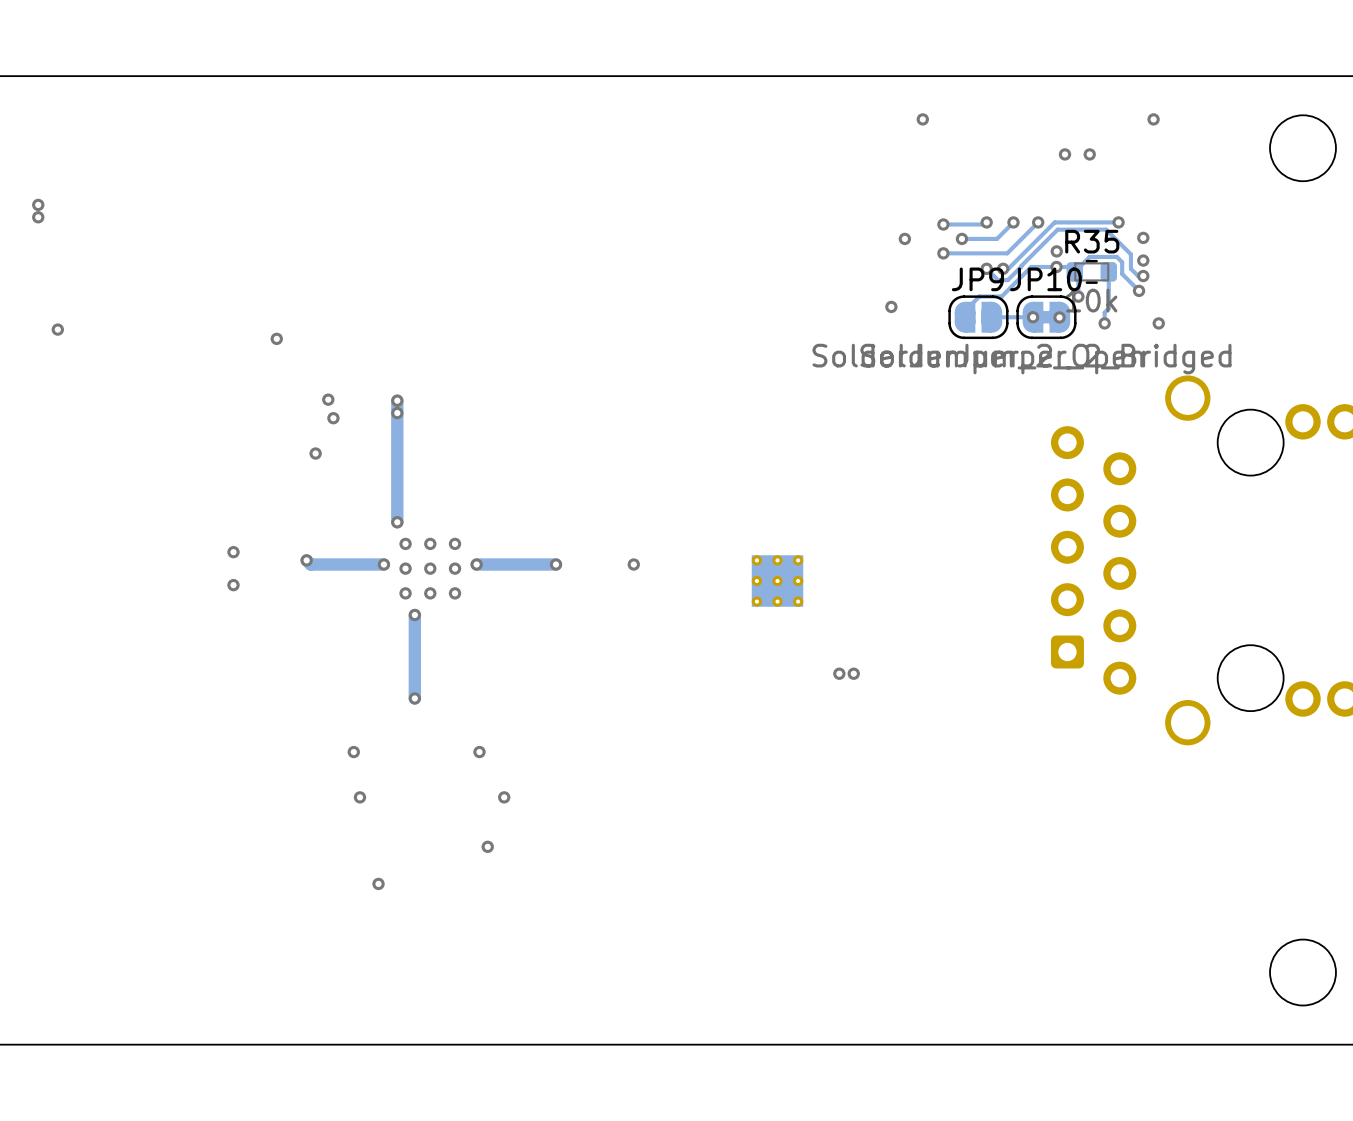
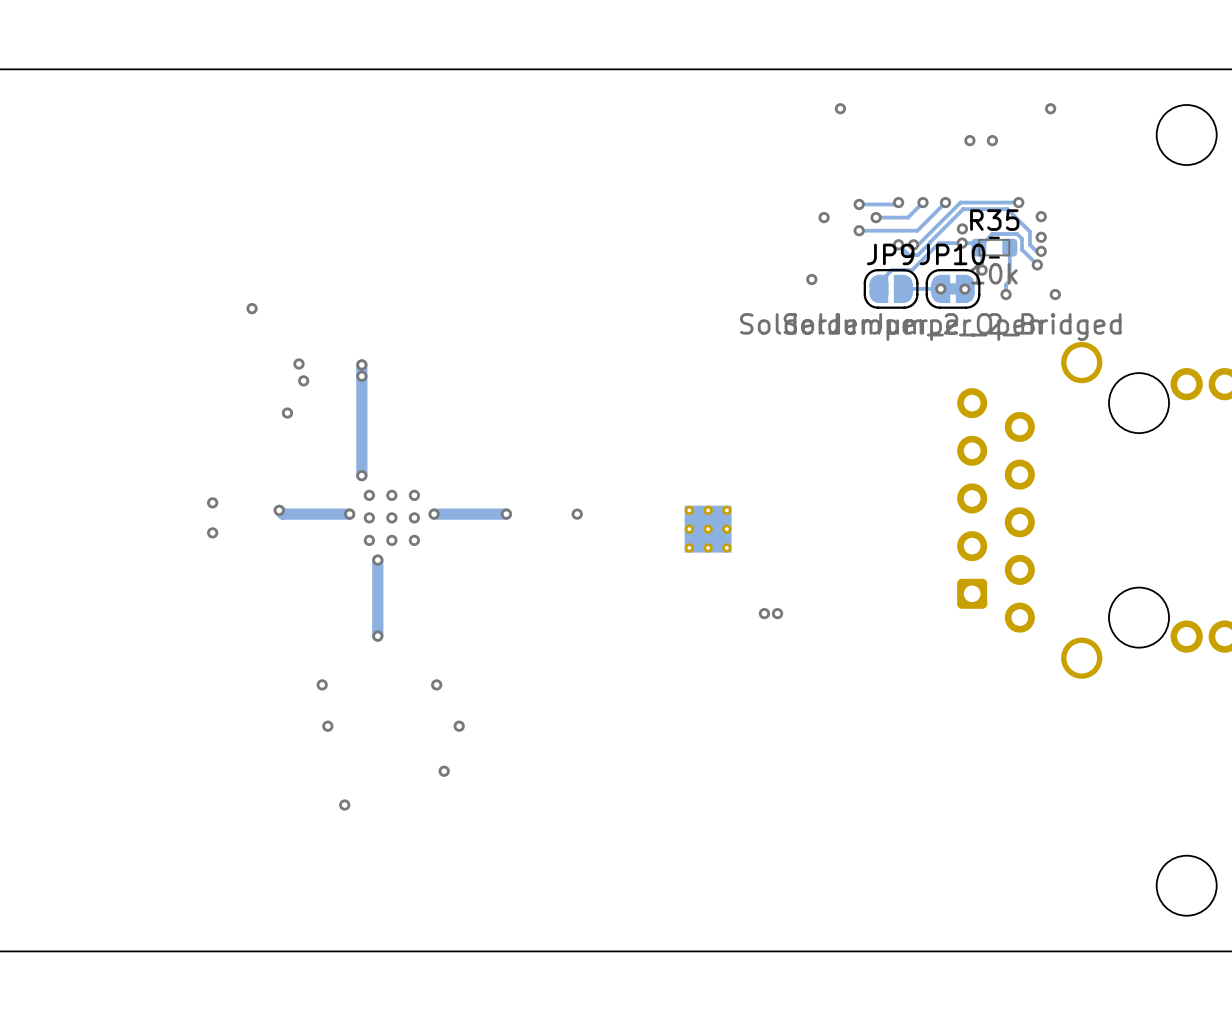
via: (38, 204) -> none
via: (38, 217) -> none
via: (57, 329) -> none

